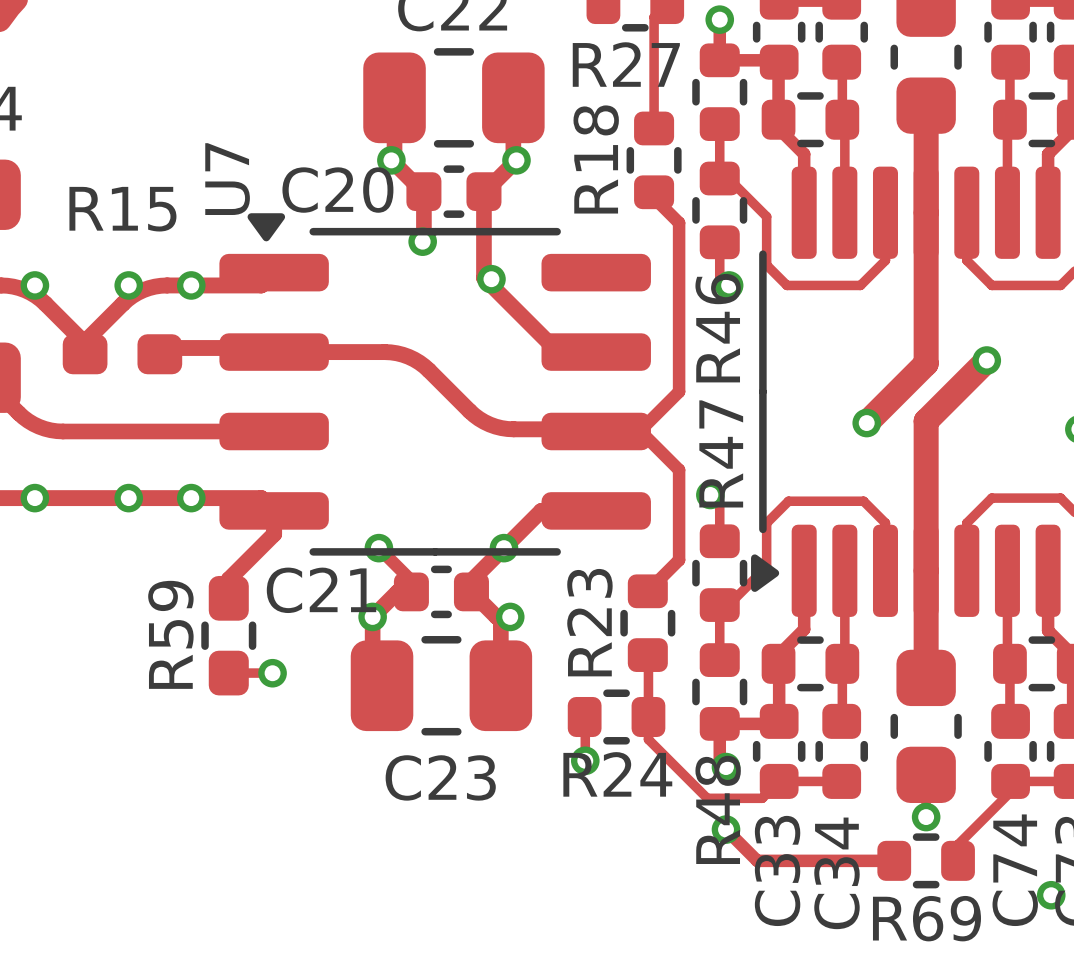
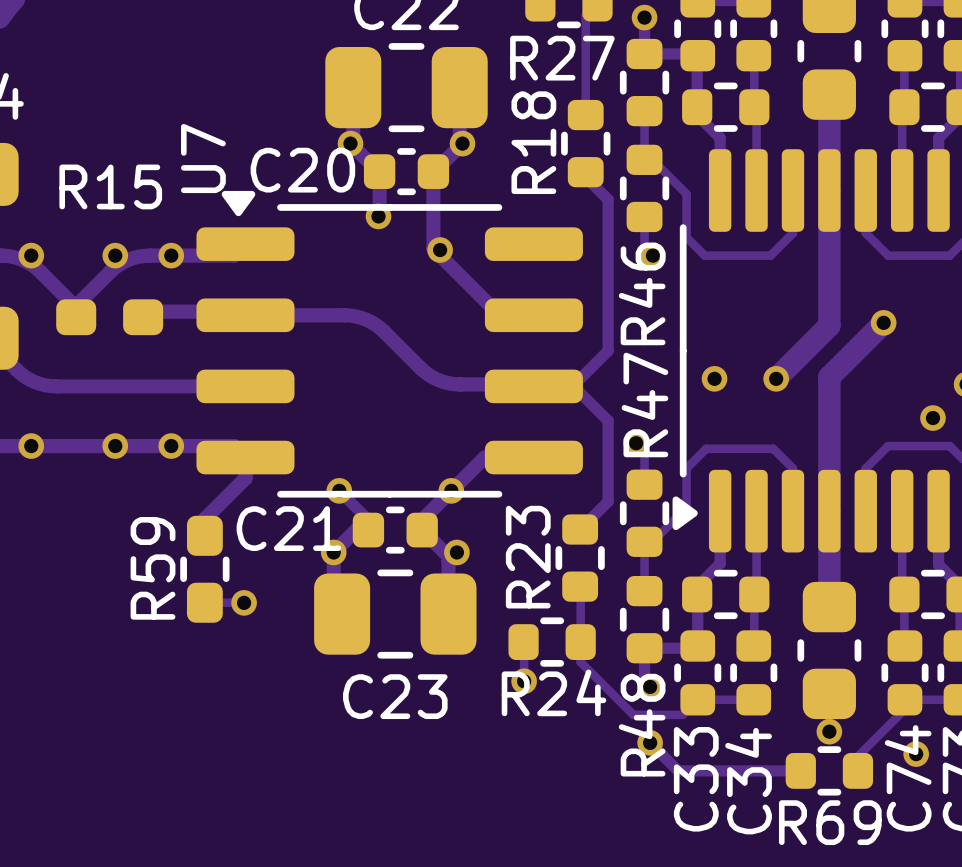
via: none -> (714, 378)
via: none -> (932, 418)
via position: (1051, 895) -> (916, 754)

